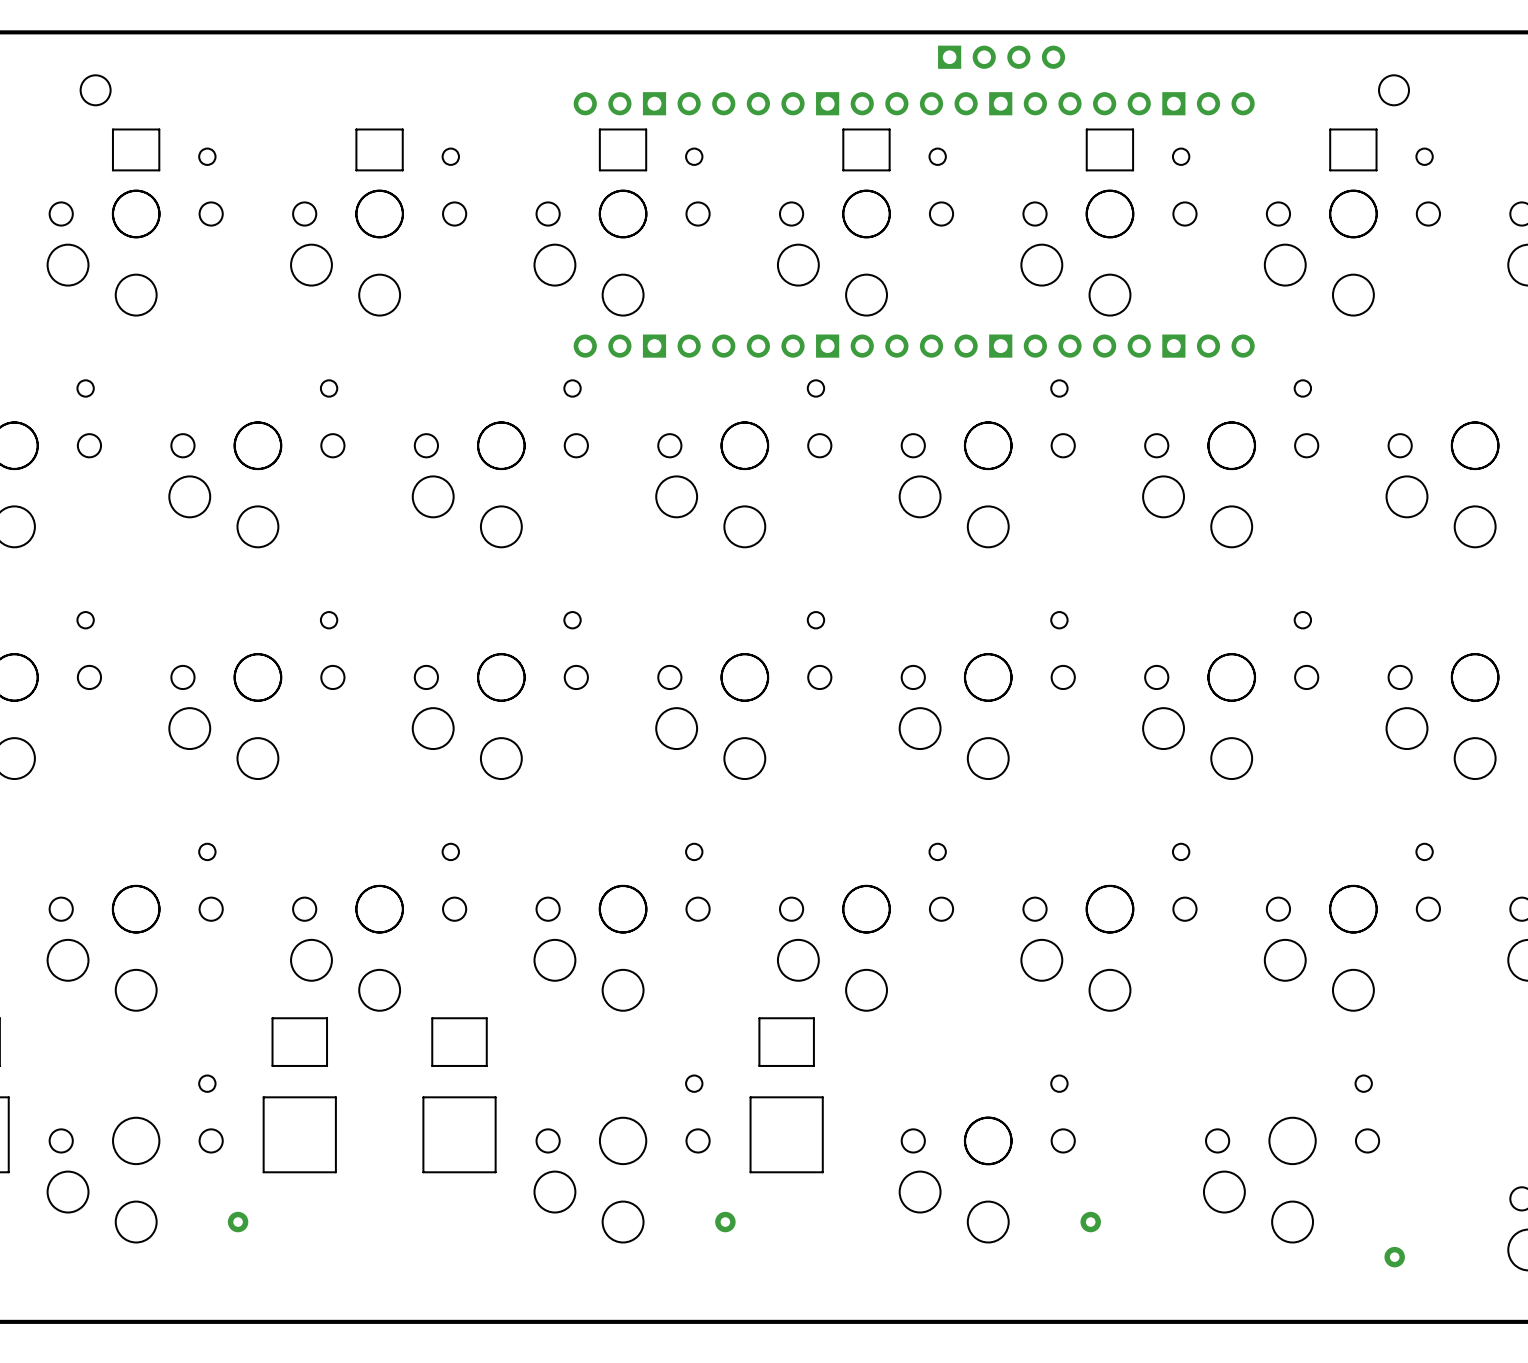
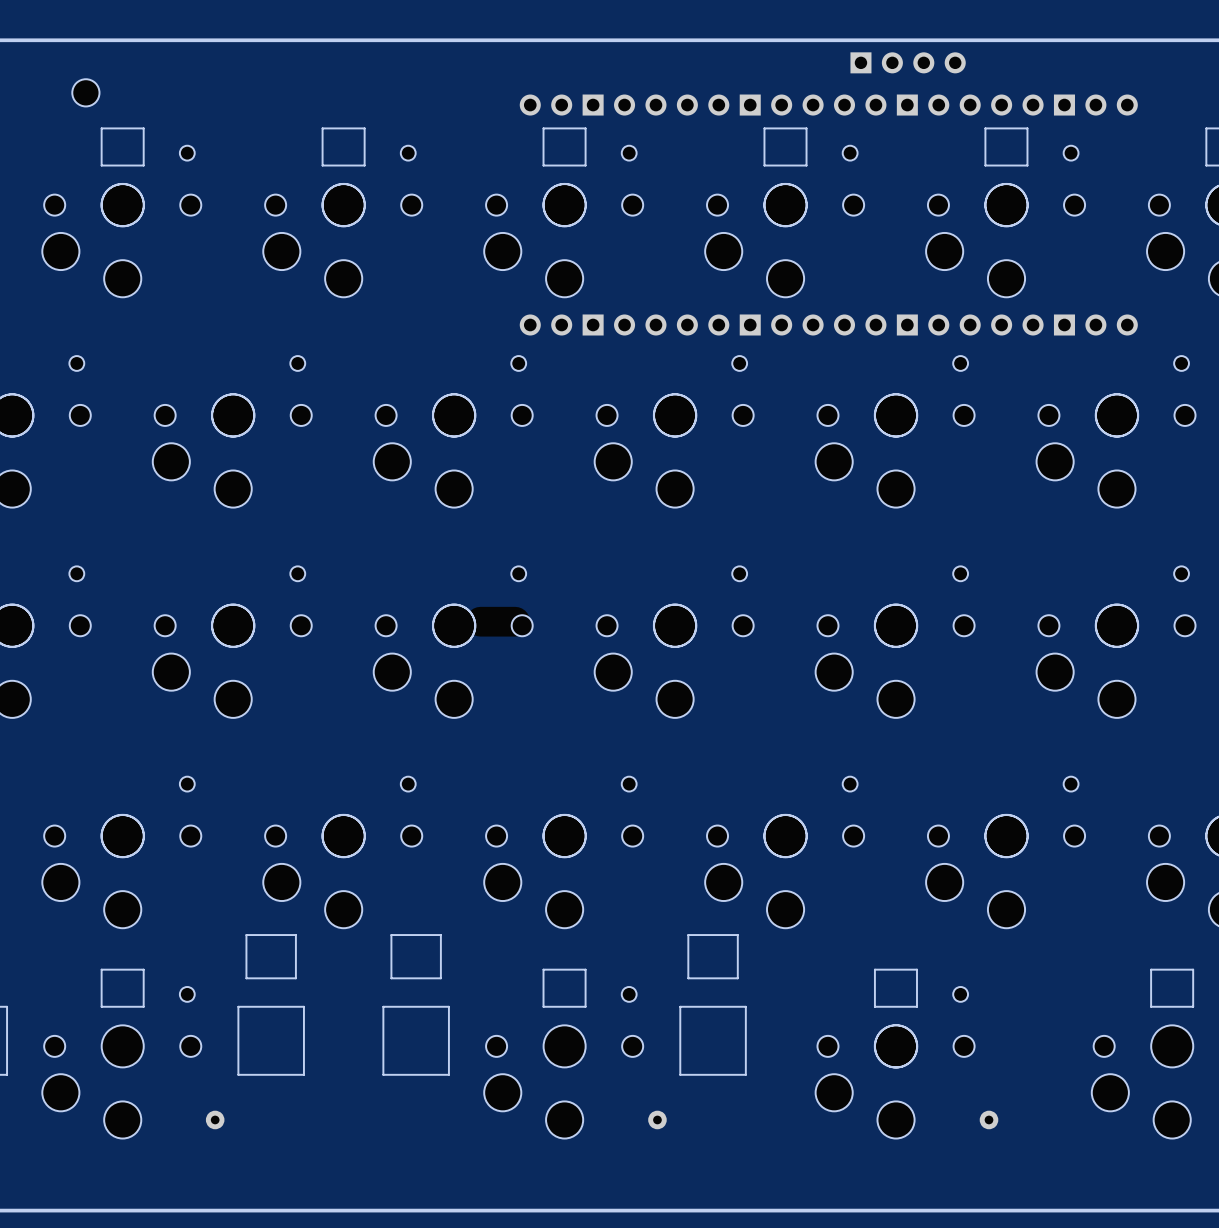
part: none -> (122, 988)
part: none -> (564, 988)
part: none -> (895, 988)
part: none -> (1172, 988)

